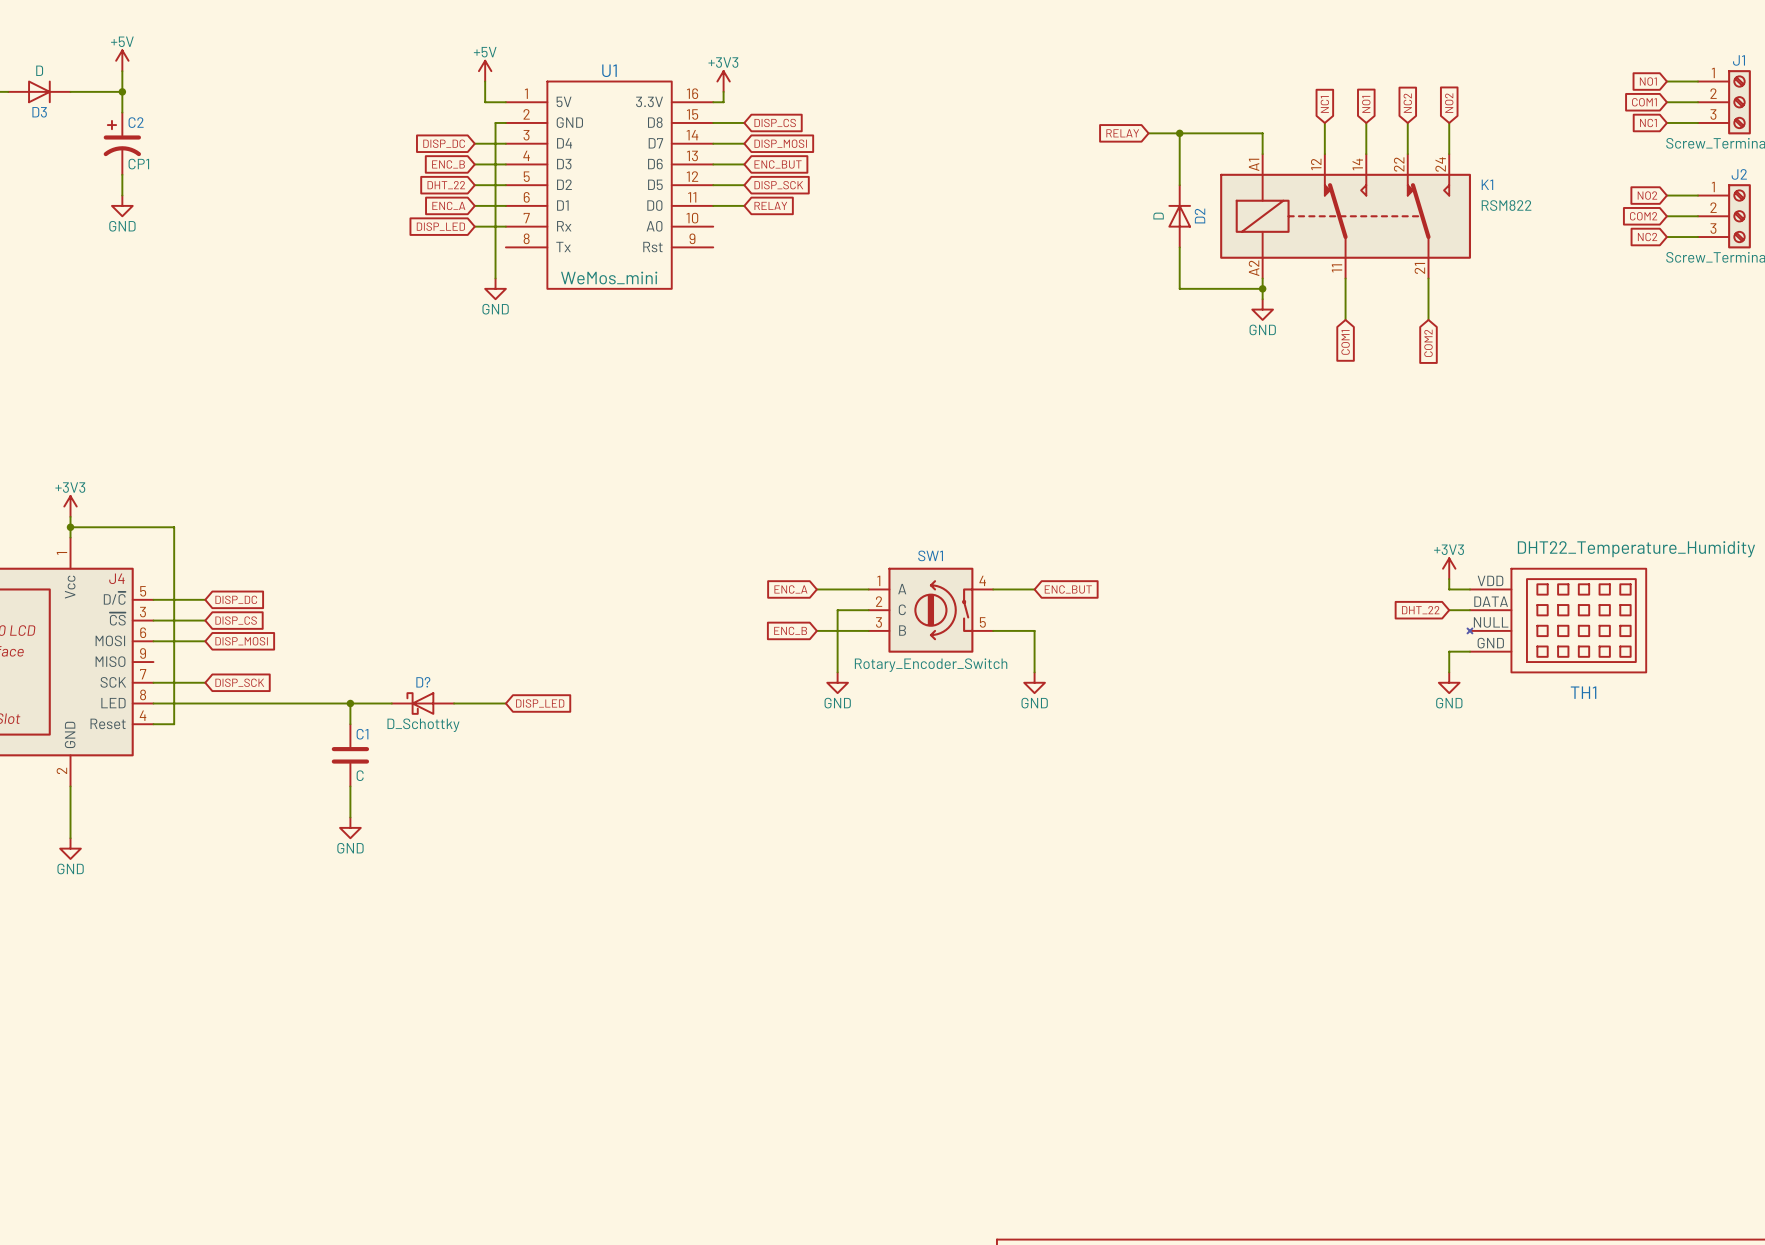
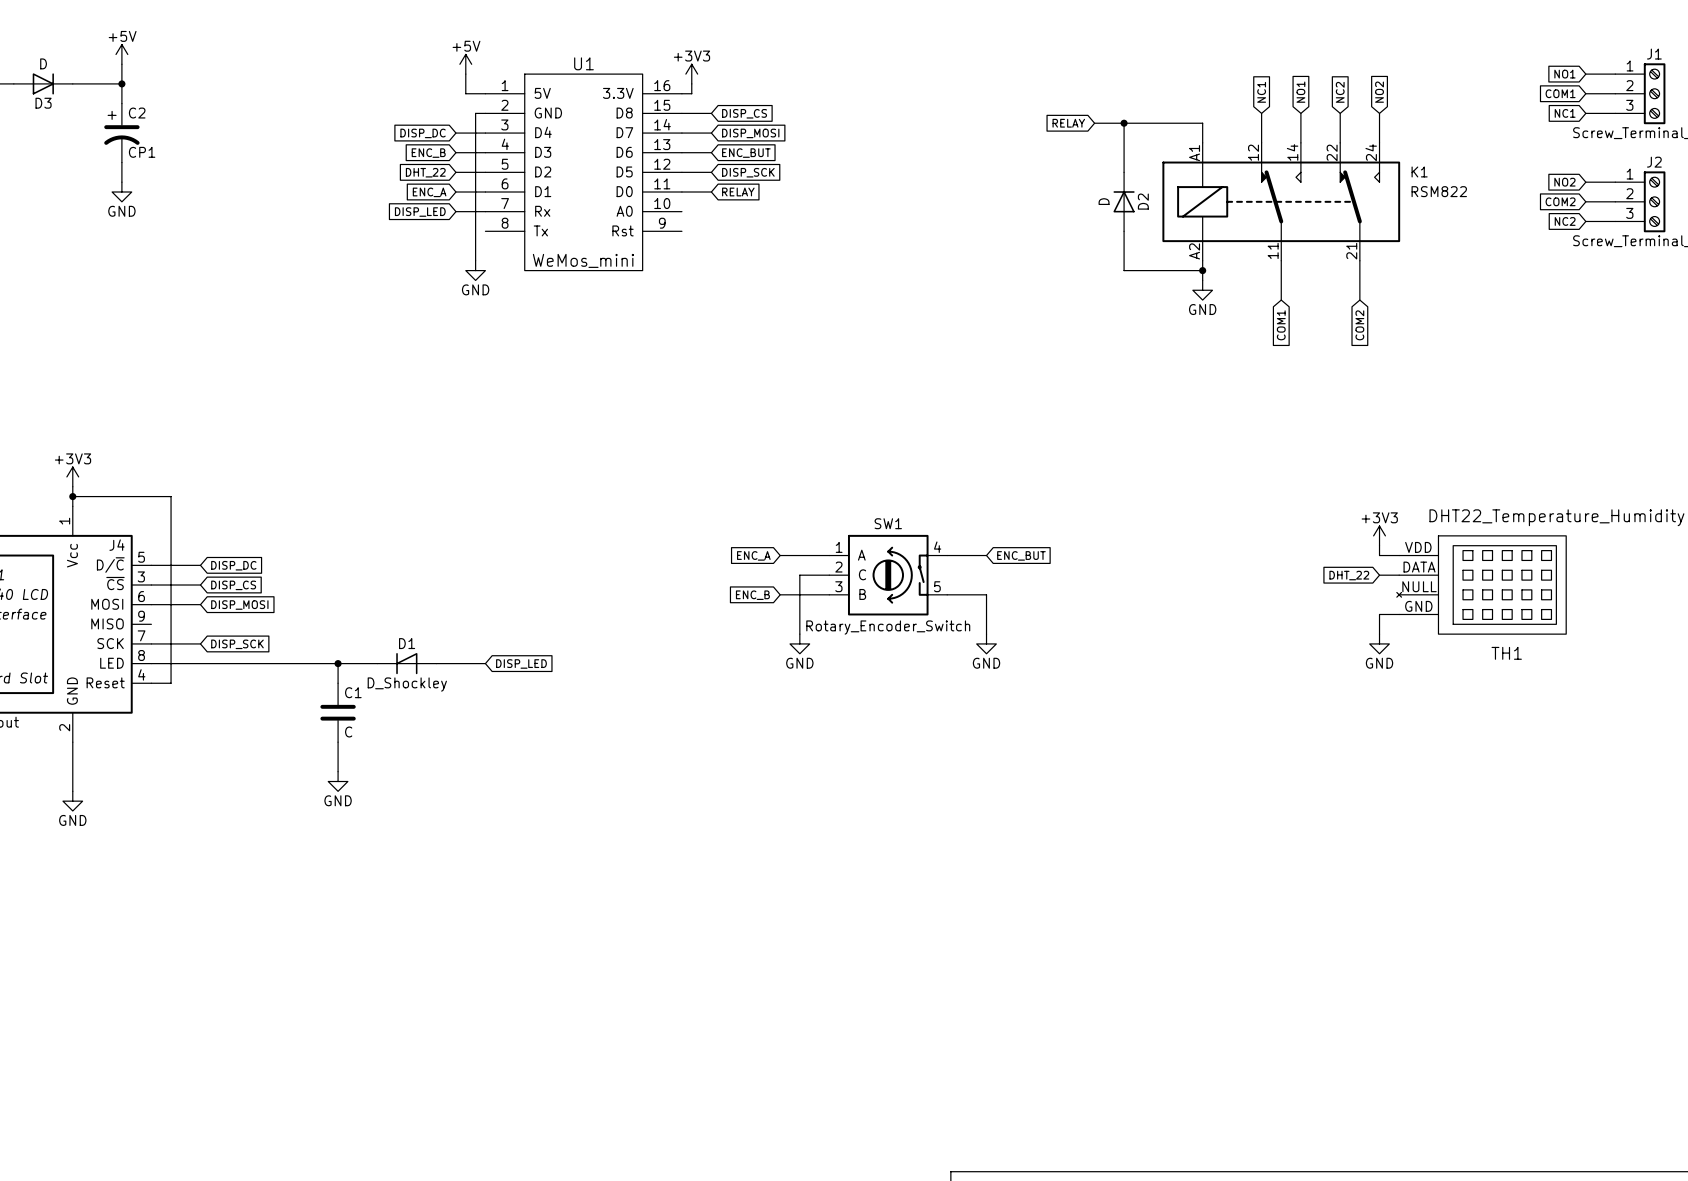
D?: D_Schottky (422, 703) -> none
D1: none -> D_Shockley (406, 663)

